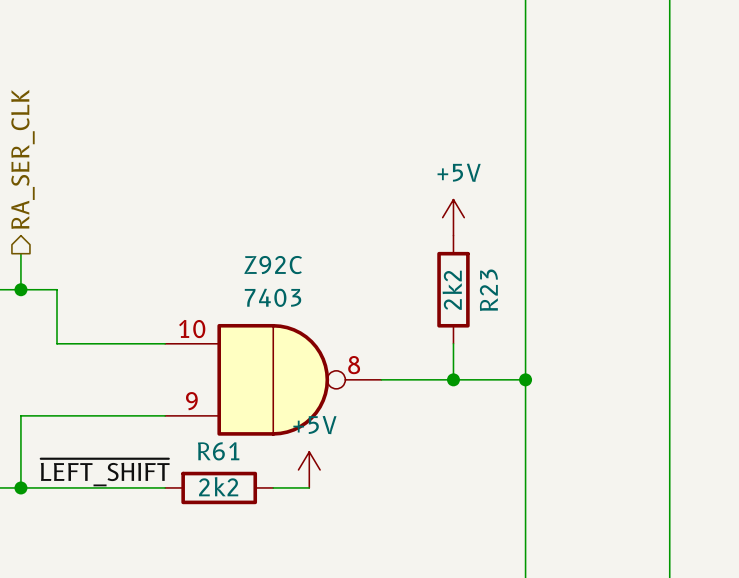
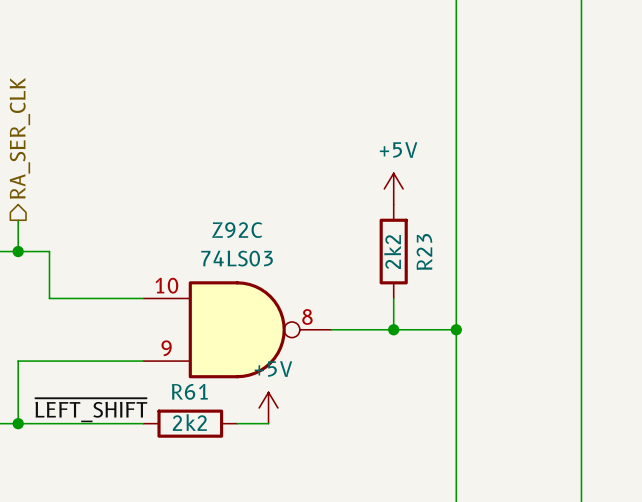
Z92C value: 7403 (273, 297) -> 74LS03 (237, 258)
Z92C symbol: [165, 323, 382, 436] -> [143, 281, 332, 379]

